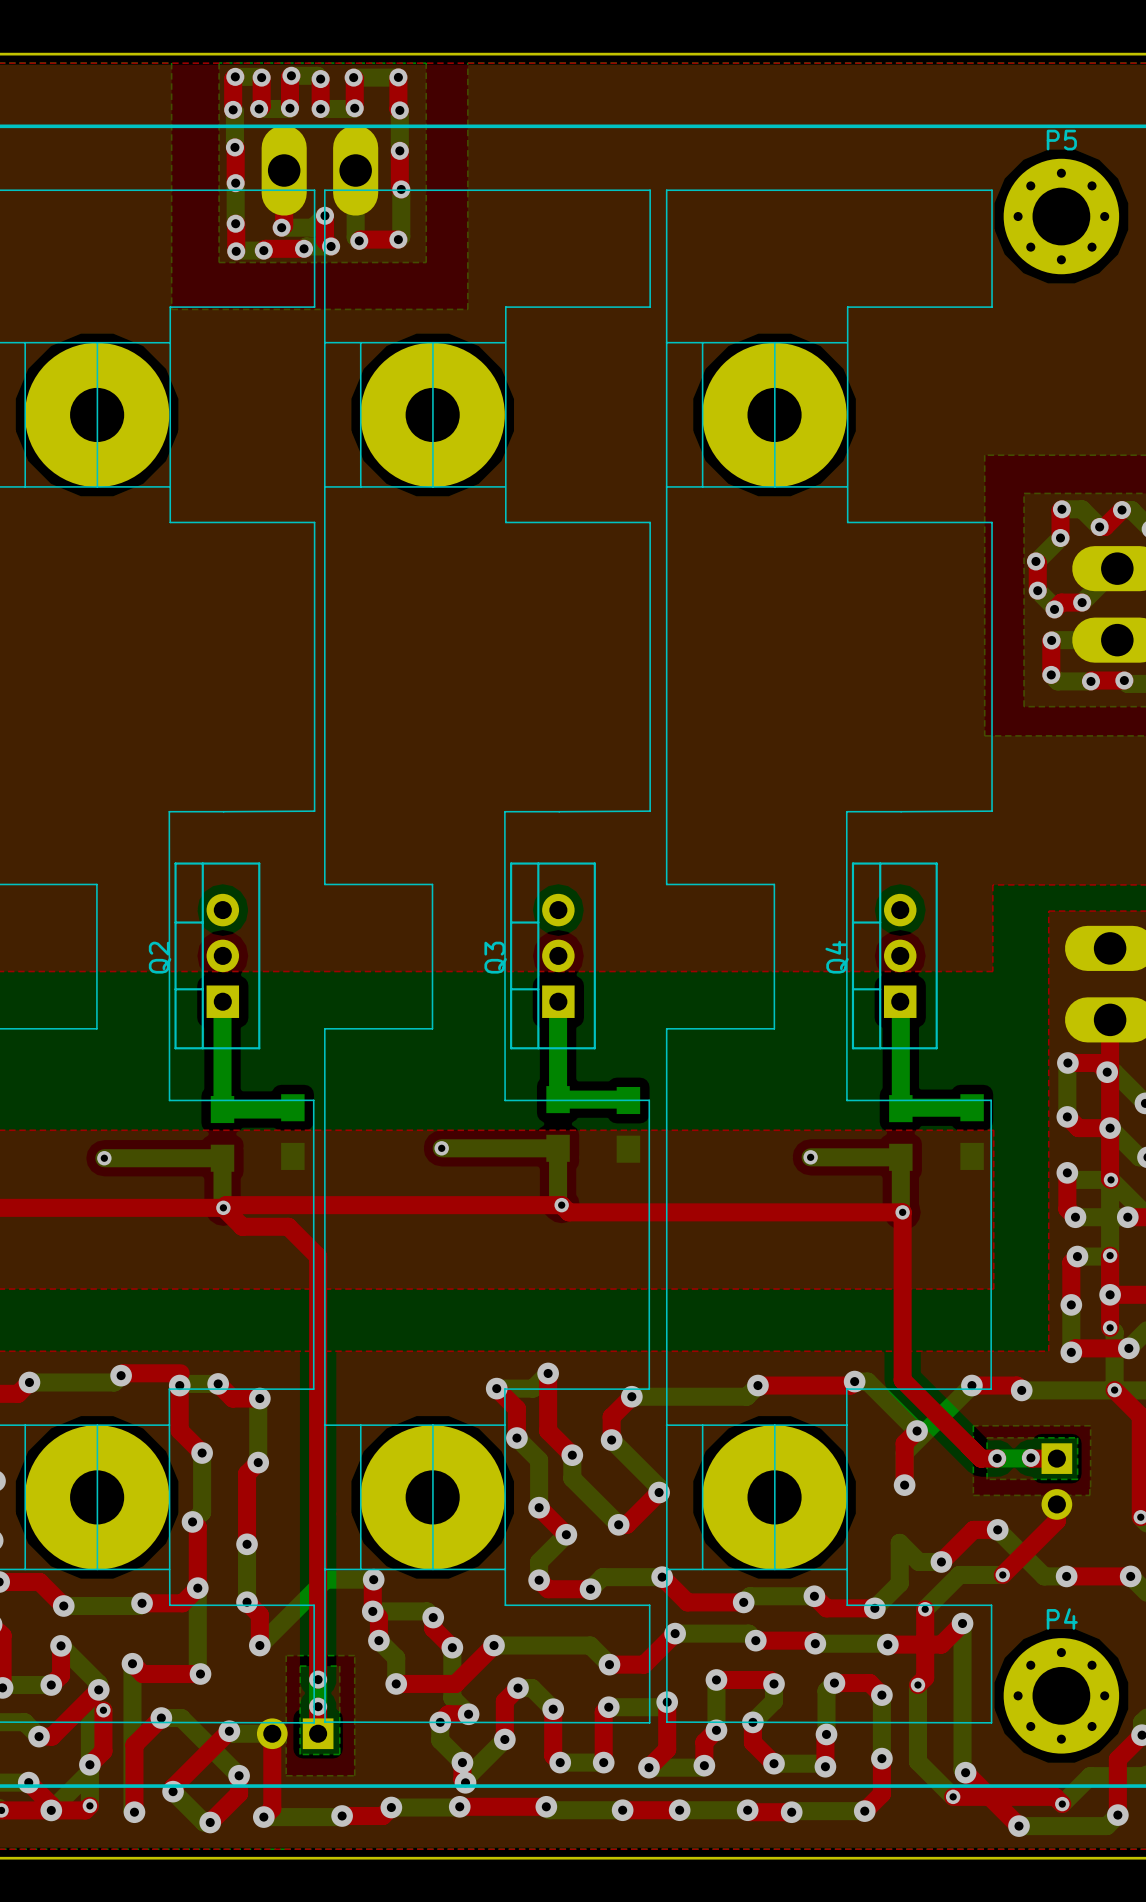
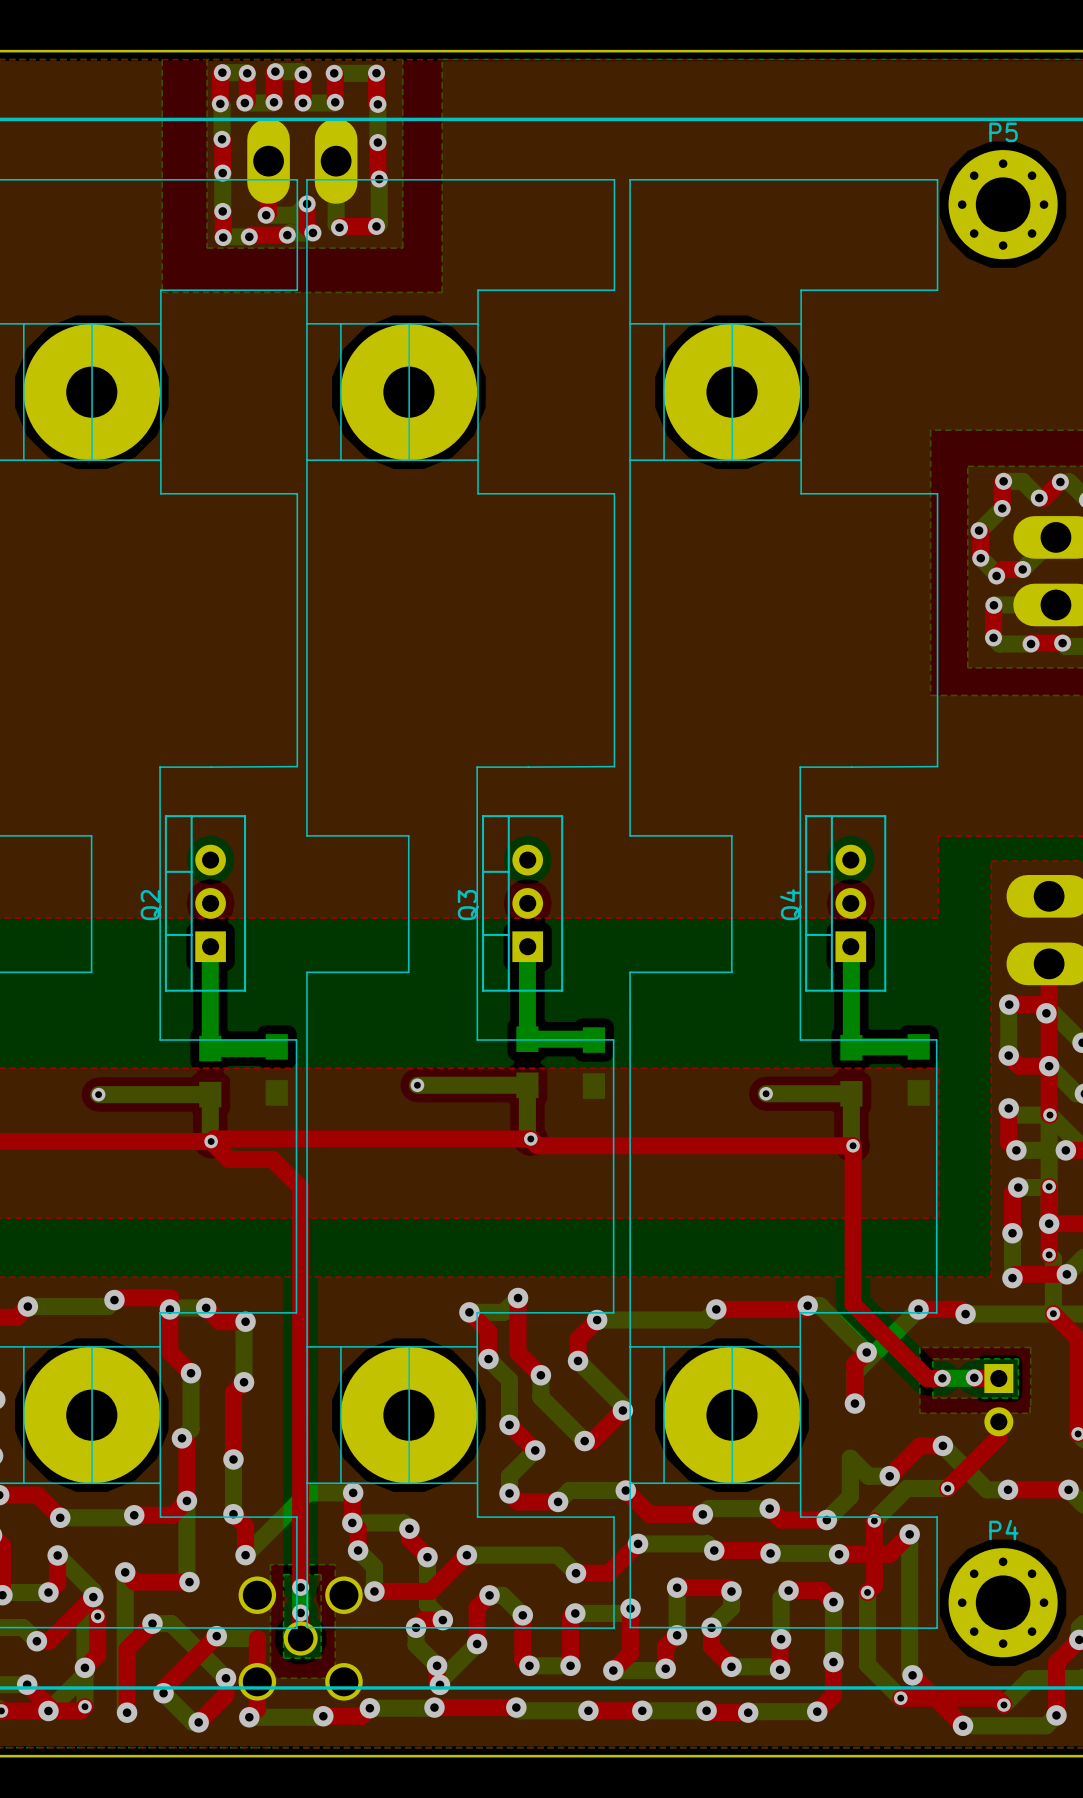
part: (295, 1733) -> none
part: none -> (300, 1638)

